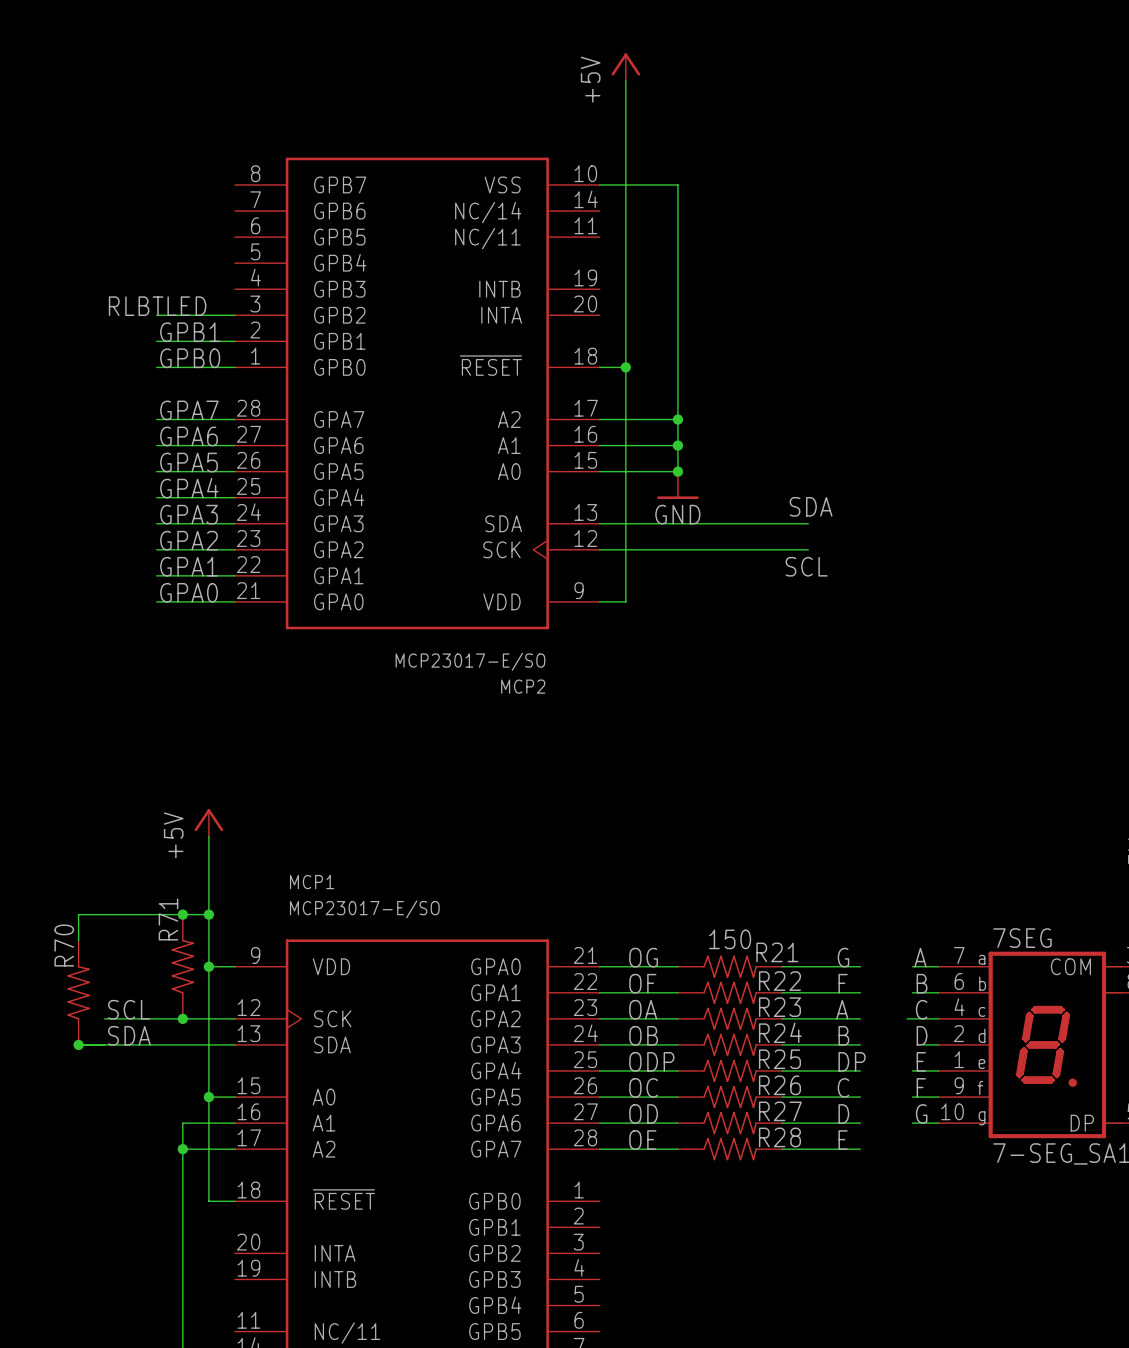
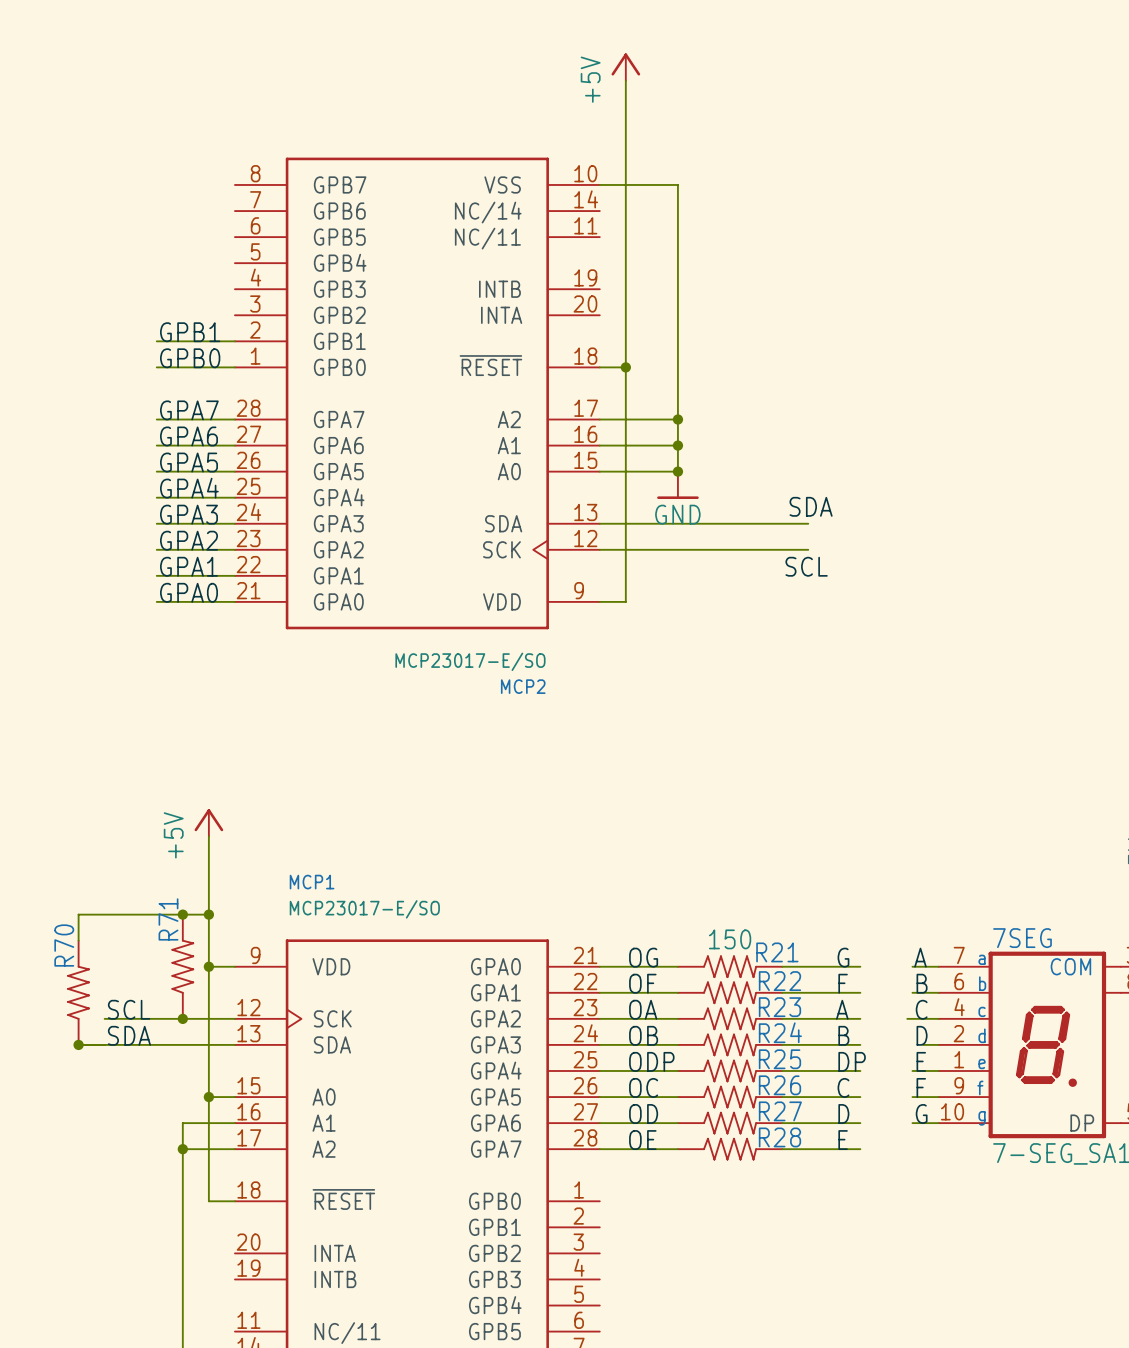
label: RLBTLED (157, 306) -> none
wire: (156, 315) (234, 315) -> none

